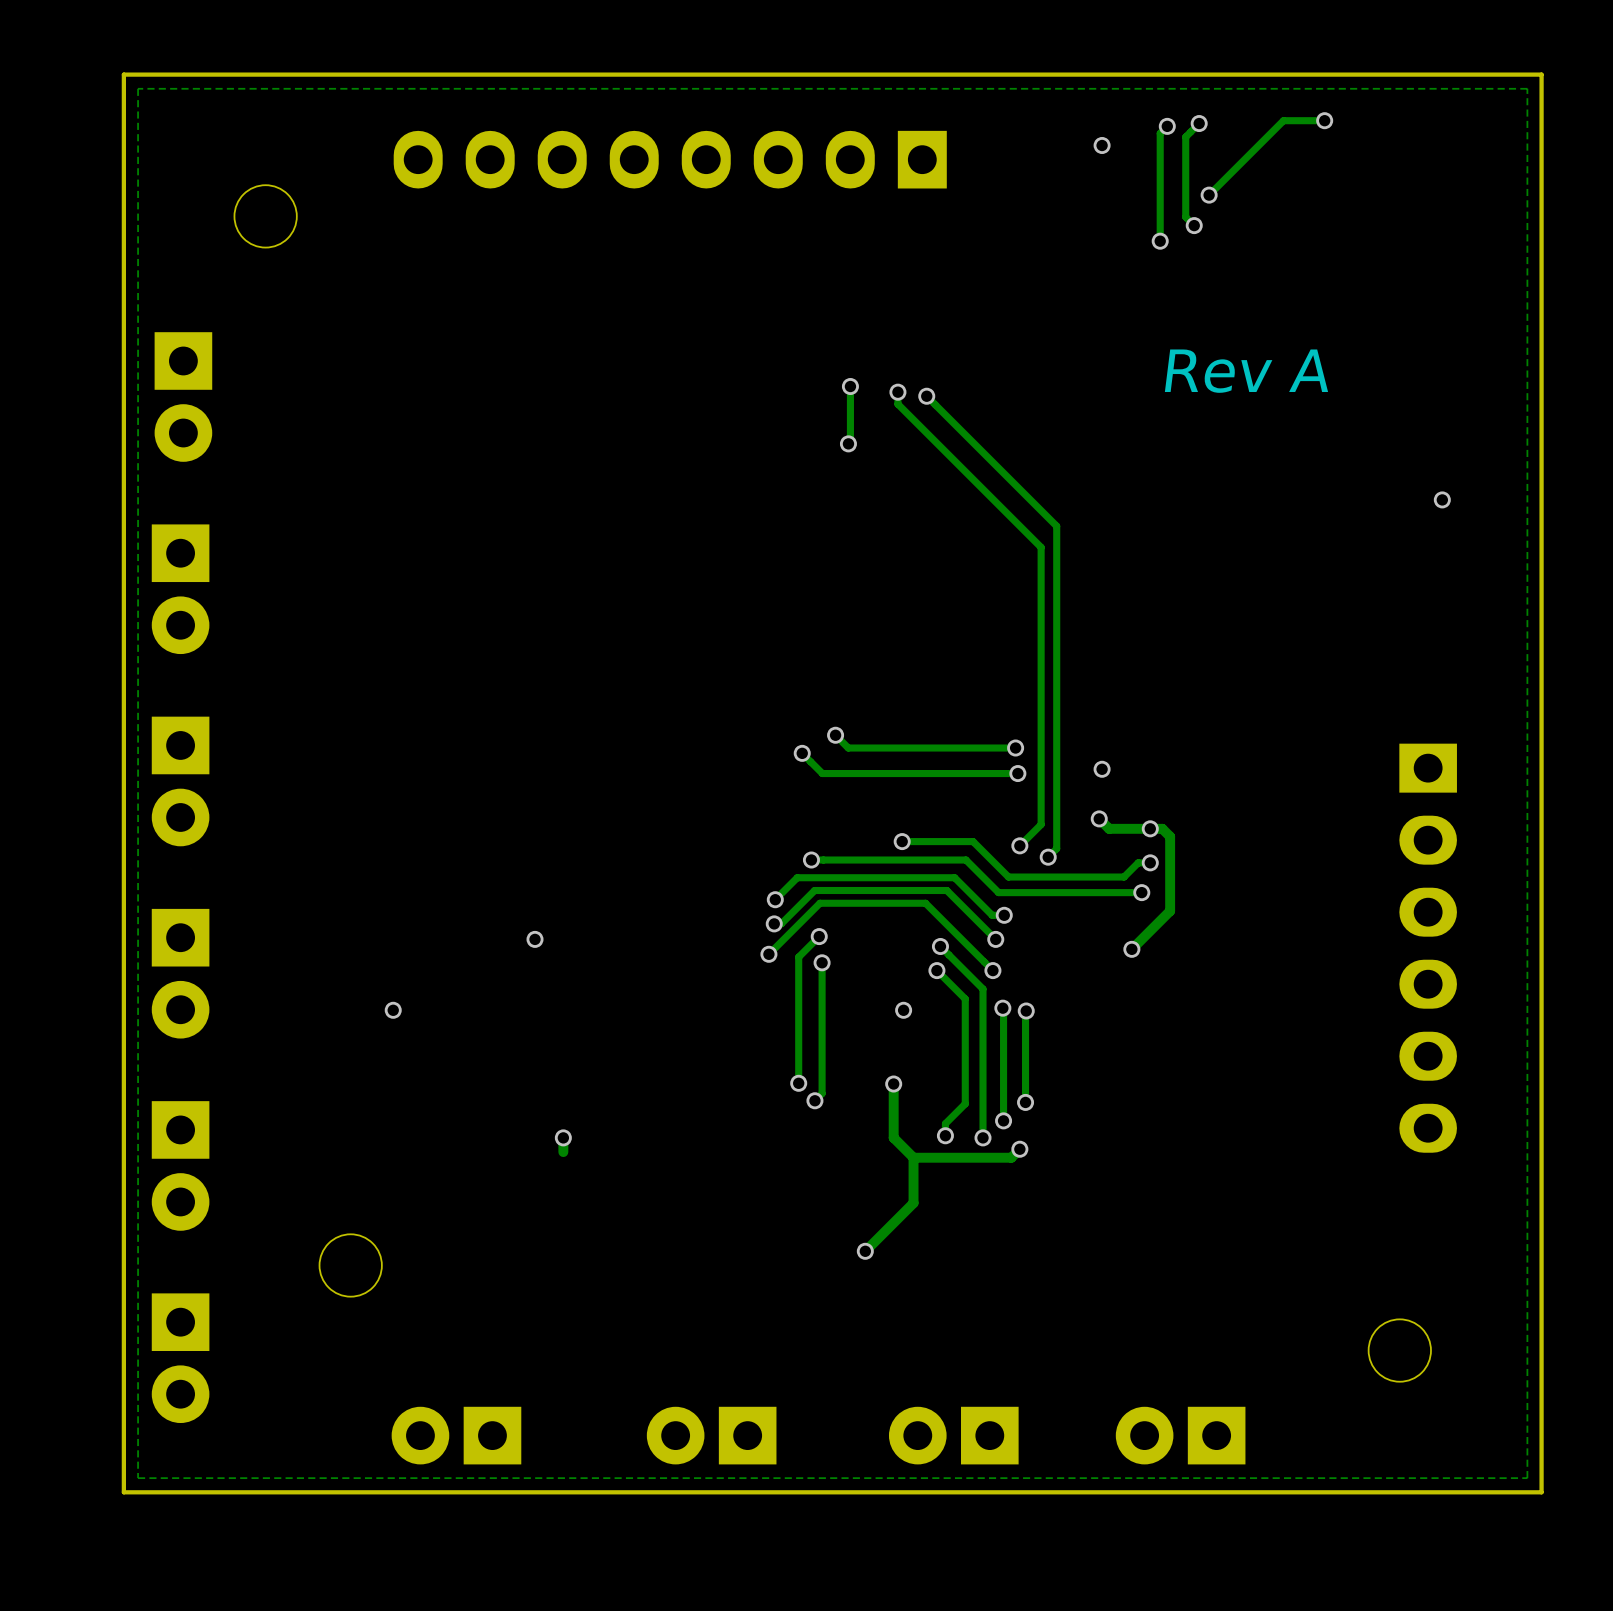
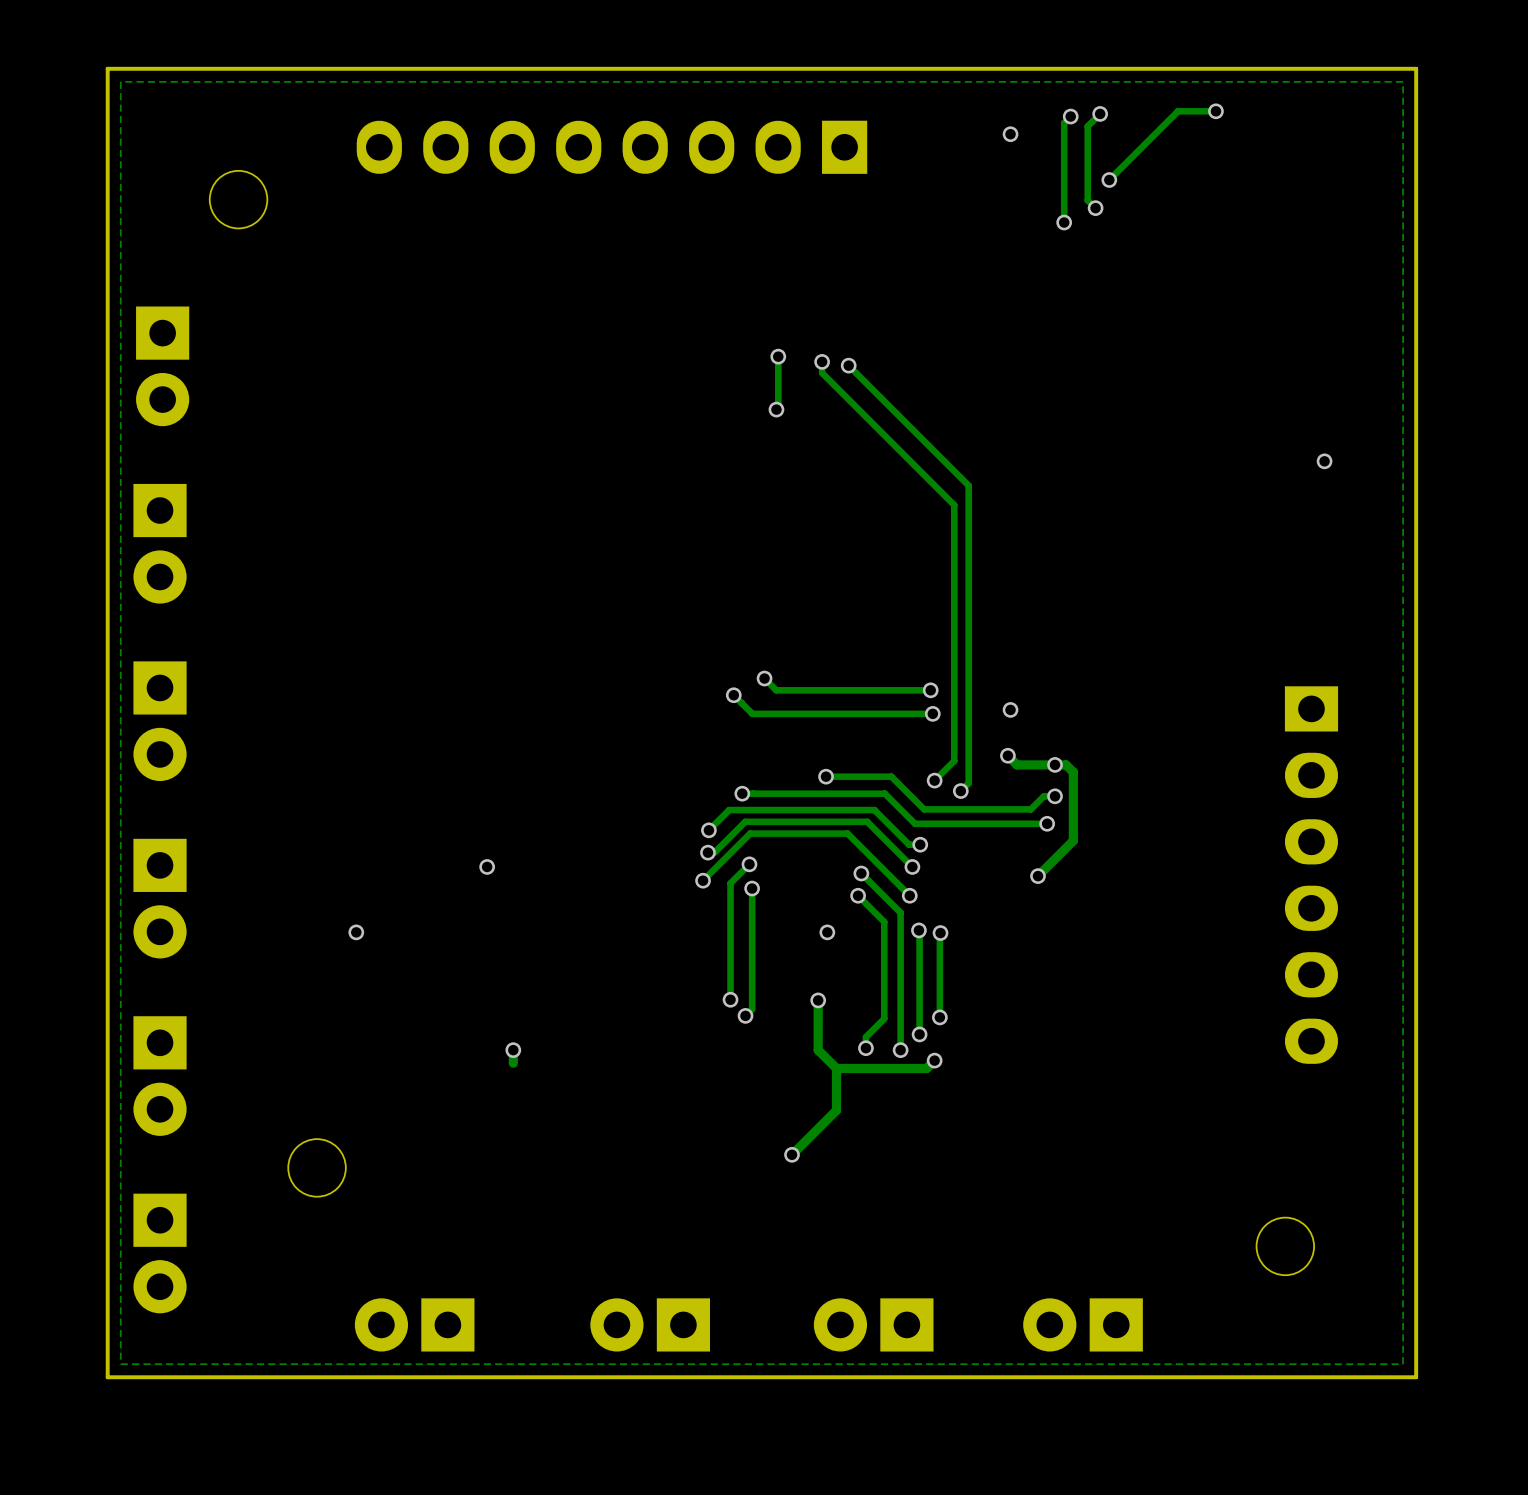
text: Rev A (1246, 371) -> none

